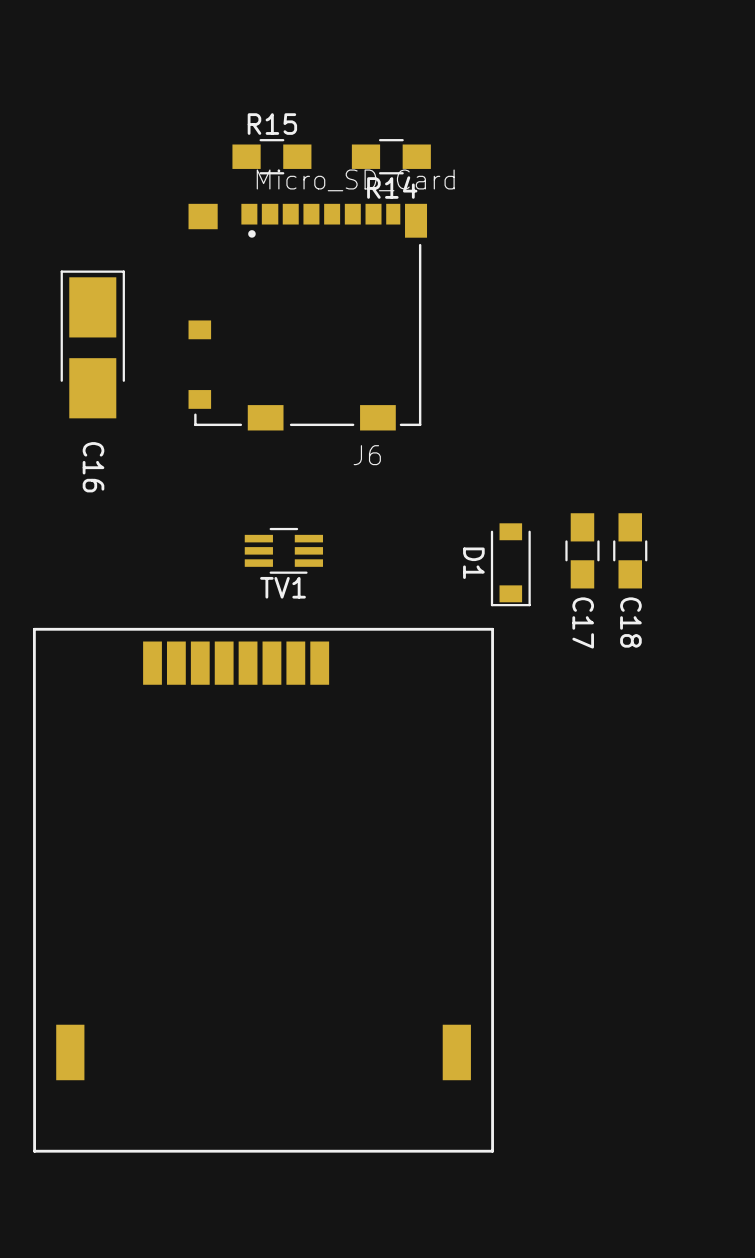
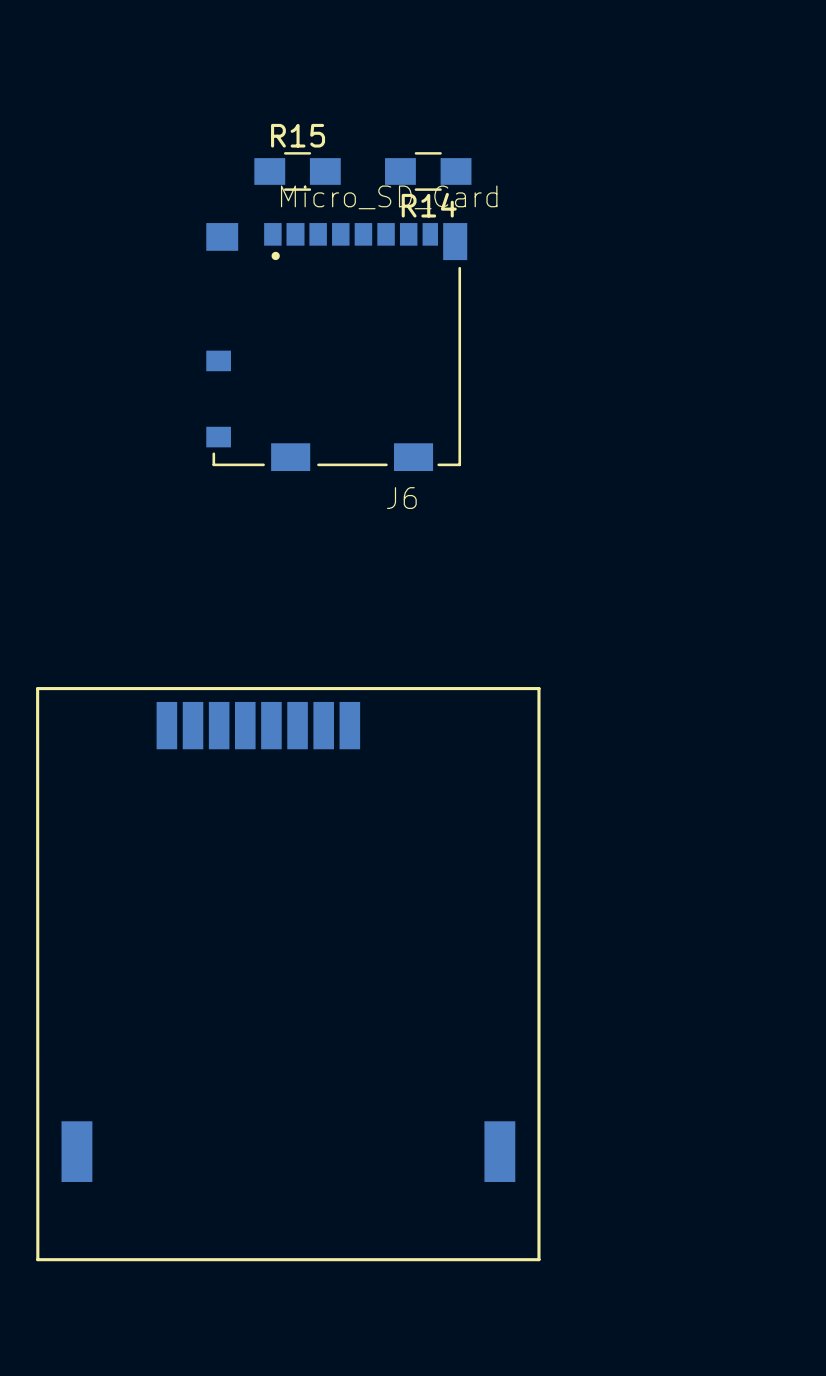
C16: (92, 344) -> none
TV1: (283, 550) -> none
C17: (582, 550) -> none
C18: (630, 550) -> none
D1: (510, 564) -> none

